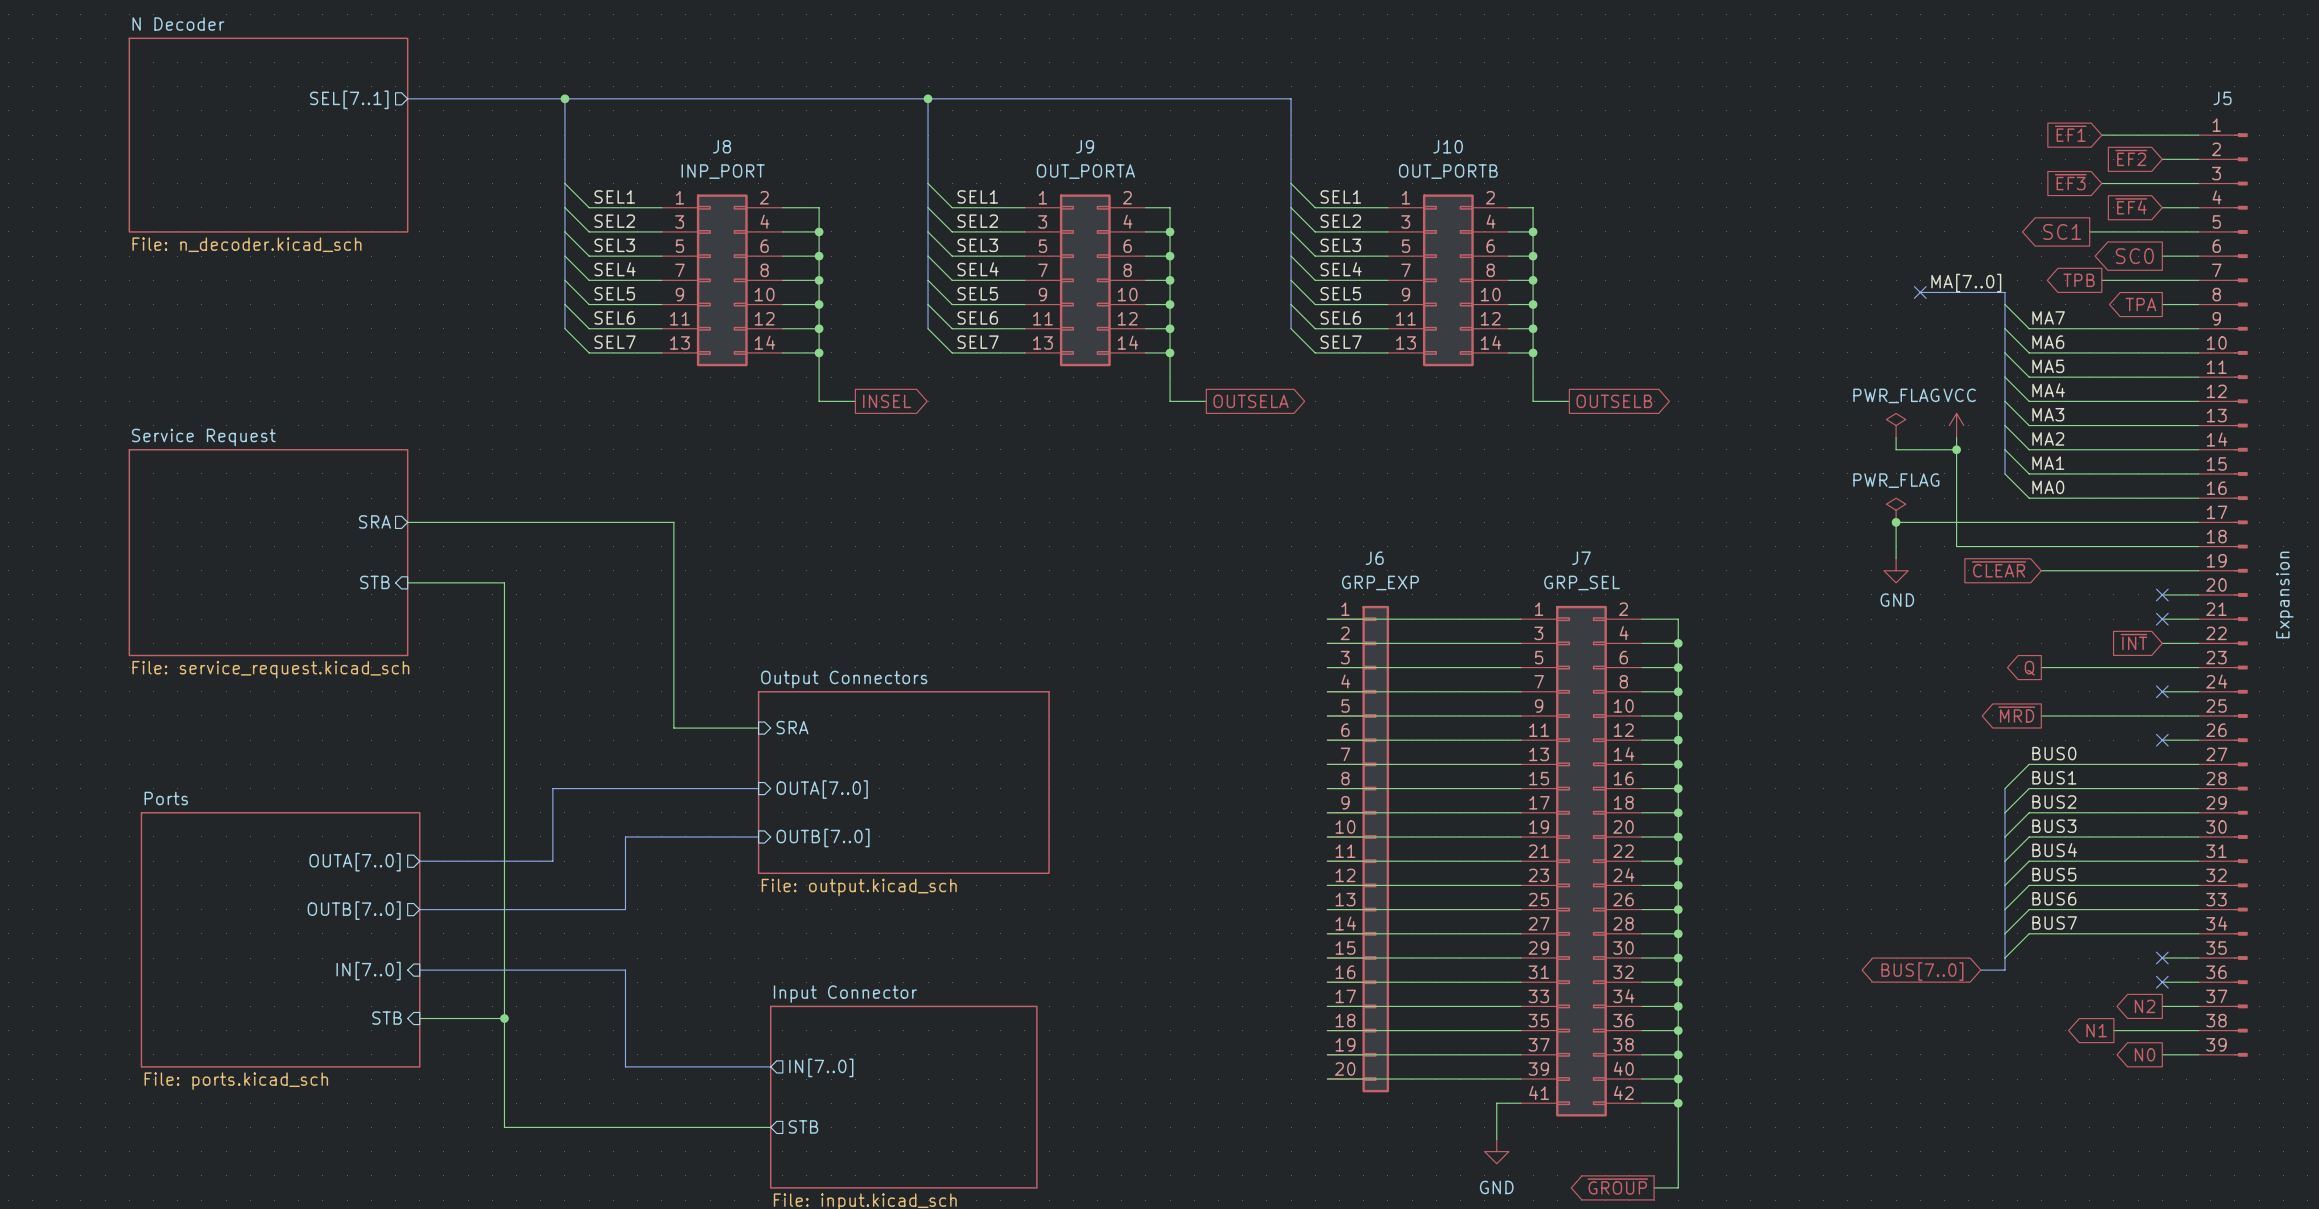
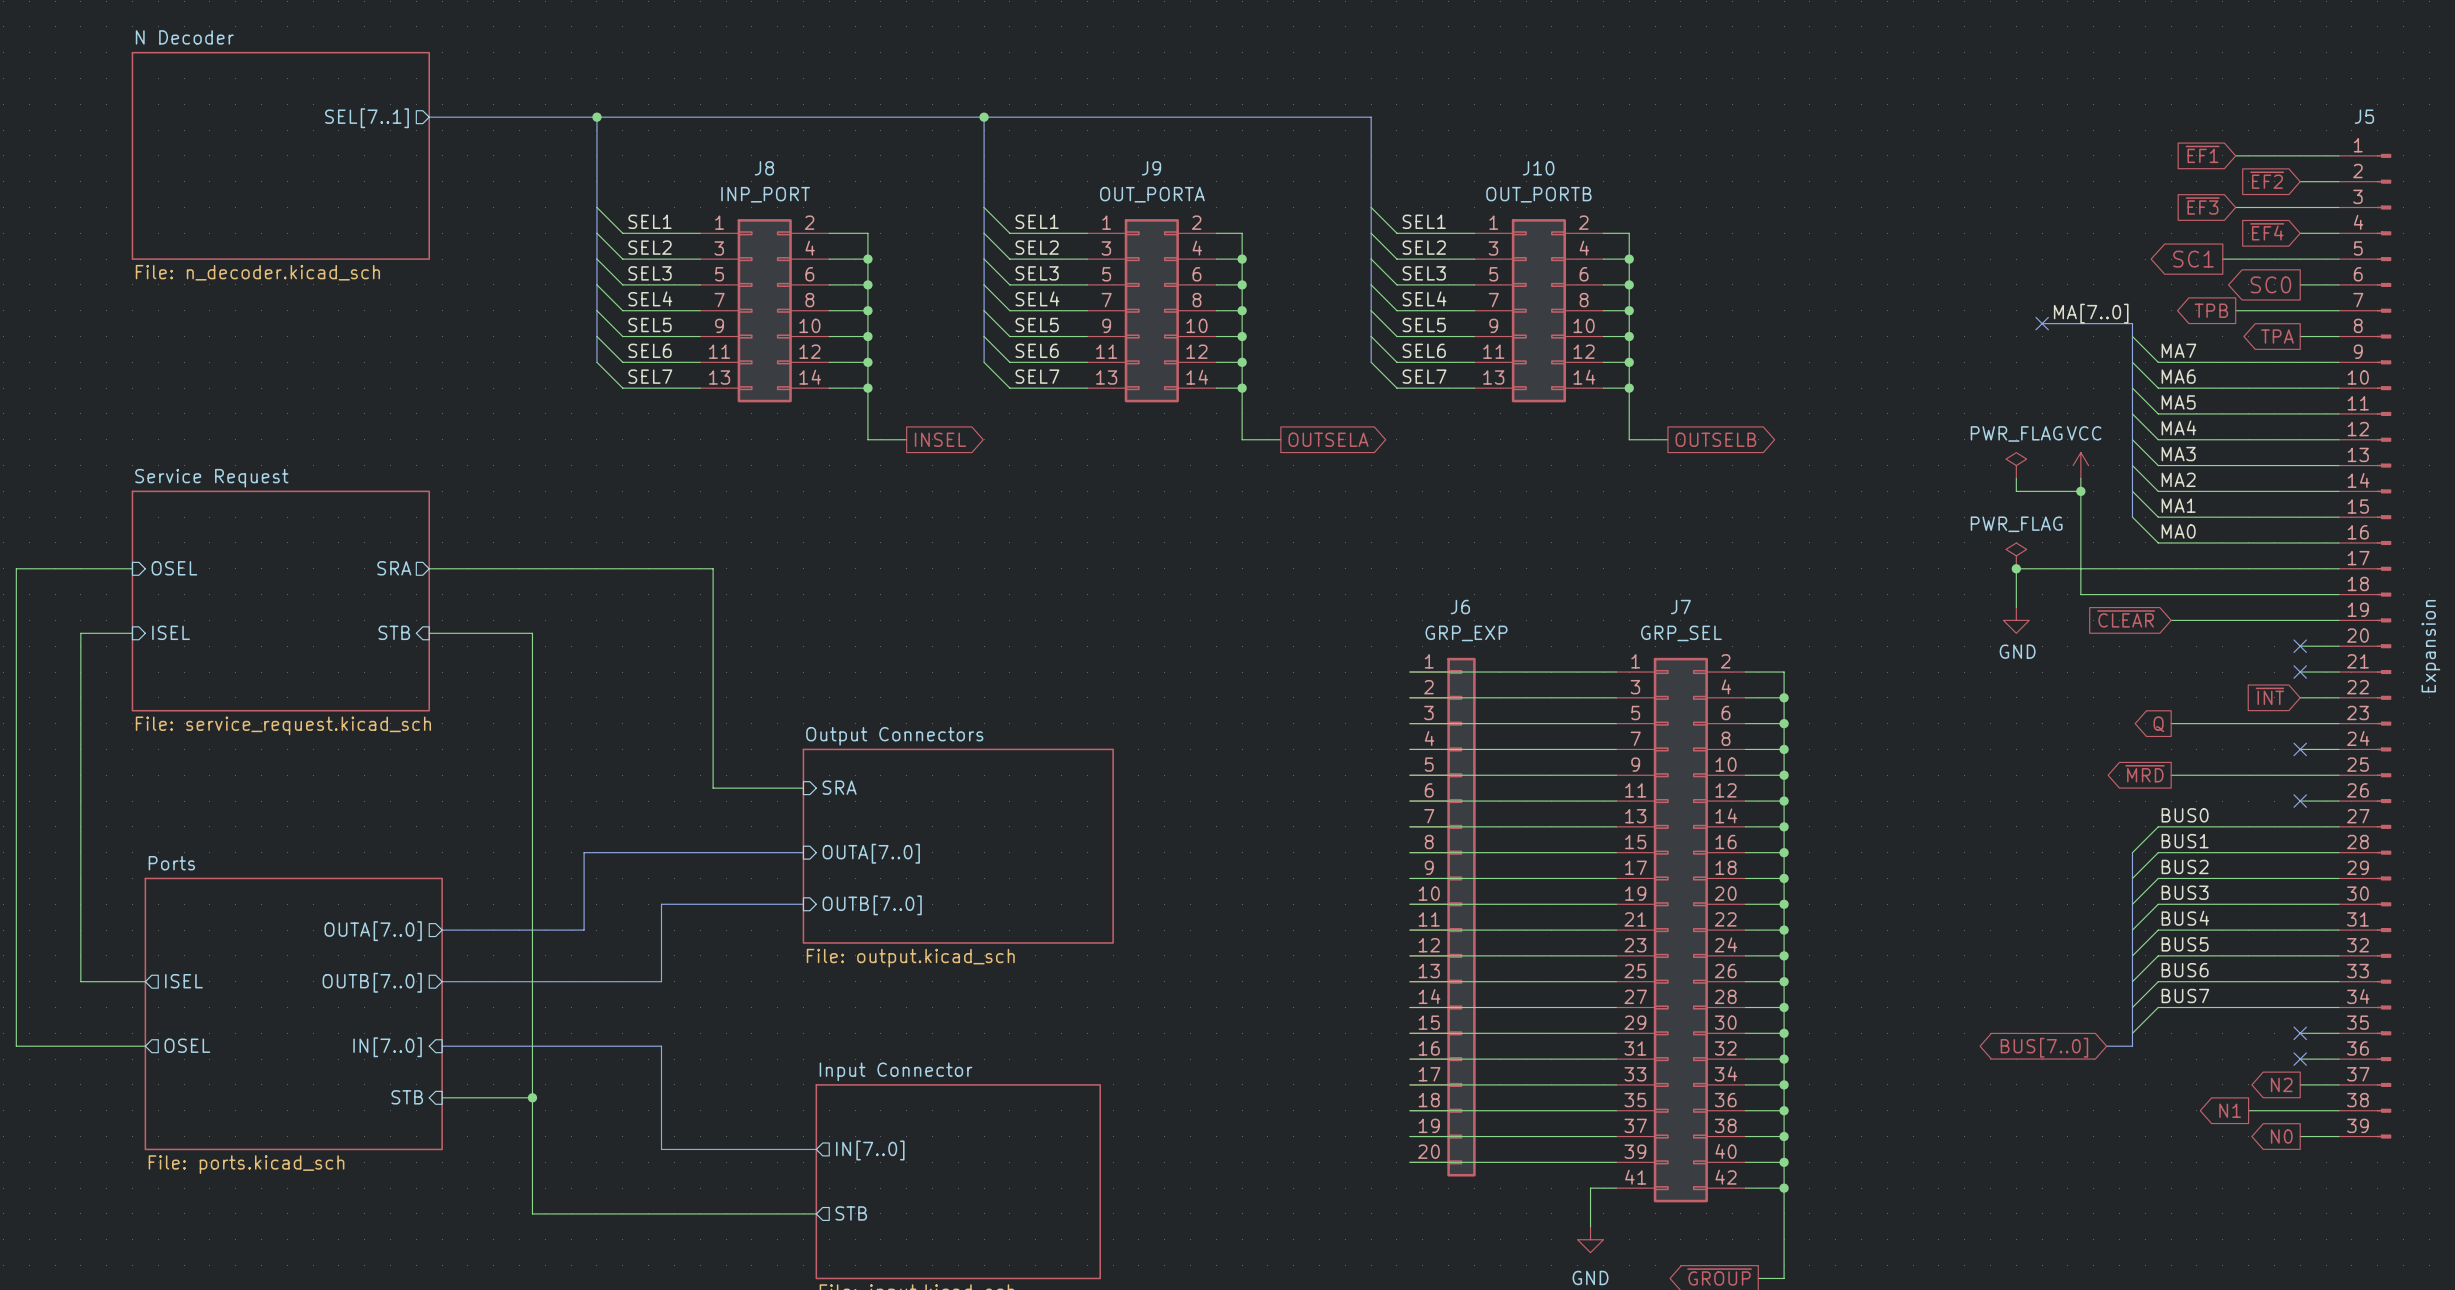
sheet pin: none -> OSEL (174, 568)
wire: none -> (132, 568) (16, 568) (16, 1046) (145, 1046)
wire: none -> (132, 633) (80, 633) (80, 981) (145, 981)
sheet pin: none -> ISEL (171, 632)
sheet pin: none -> ISEL (183, 981)
sheet pin: none -> OSEL (187, 1045)

